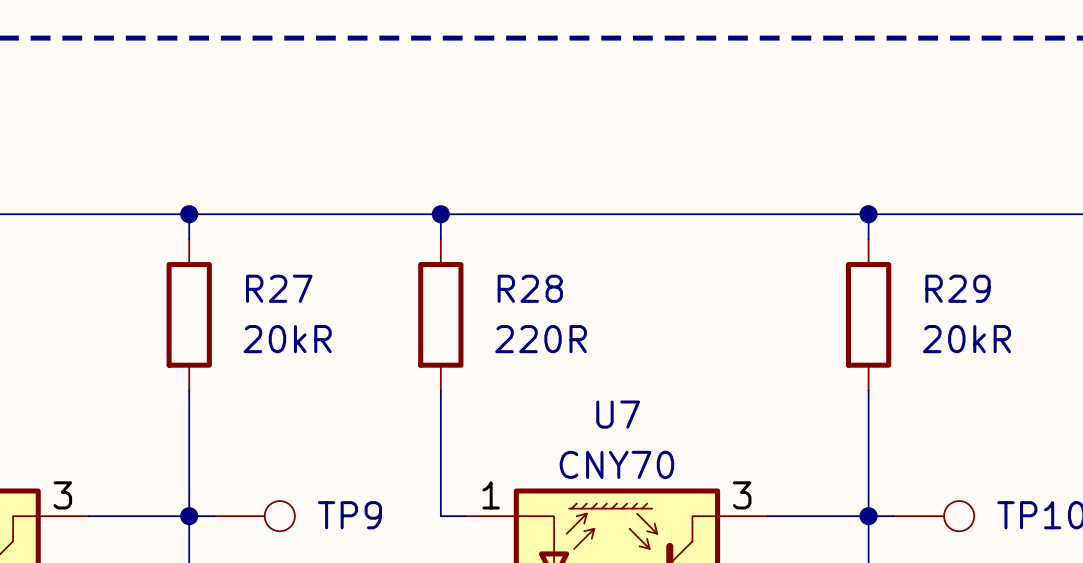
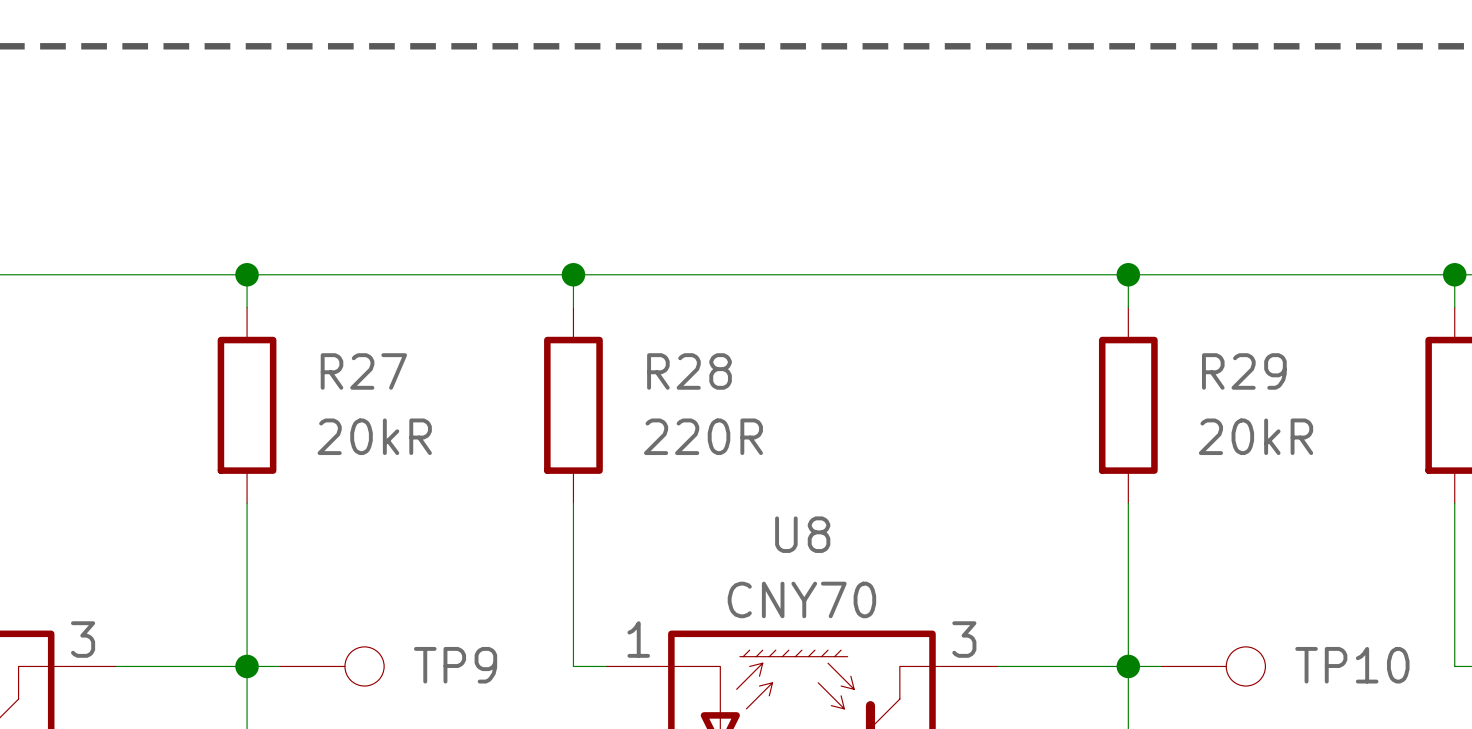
U7 name: U7 (618, 414) -> U8 (802, 534)

